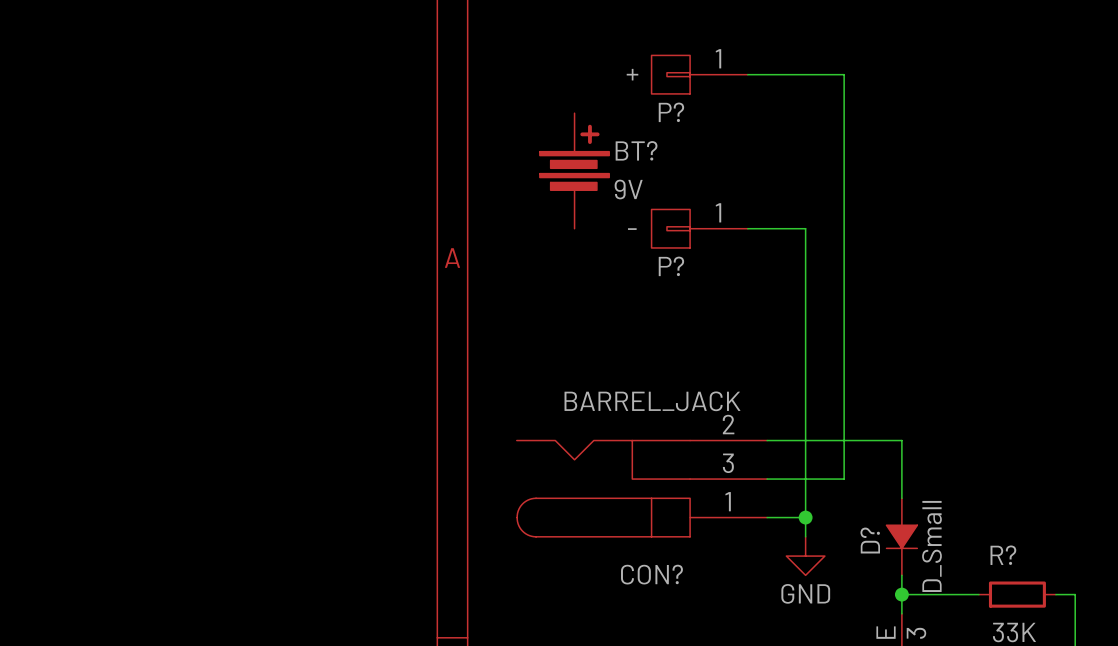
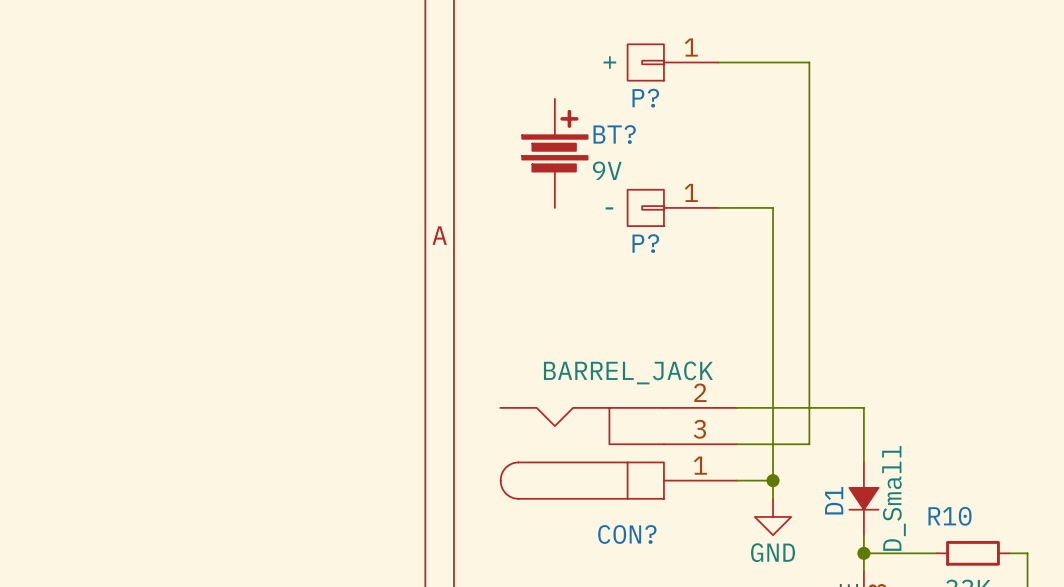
D? name: D? (870, 540) -> D1 (834, 500)
R? name: R? (1003, 555) -> R10 (950, 516)

